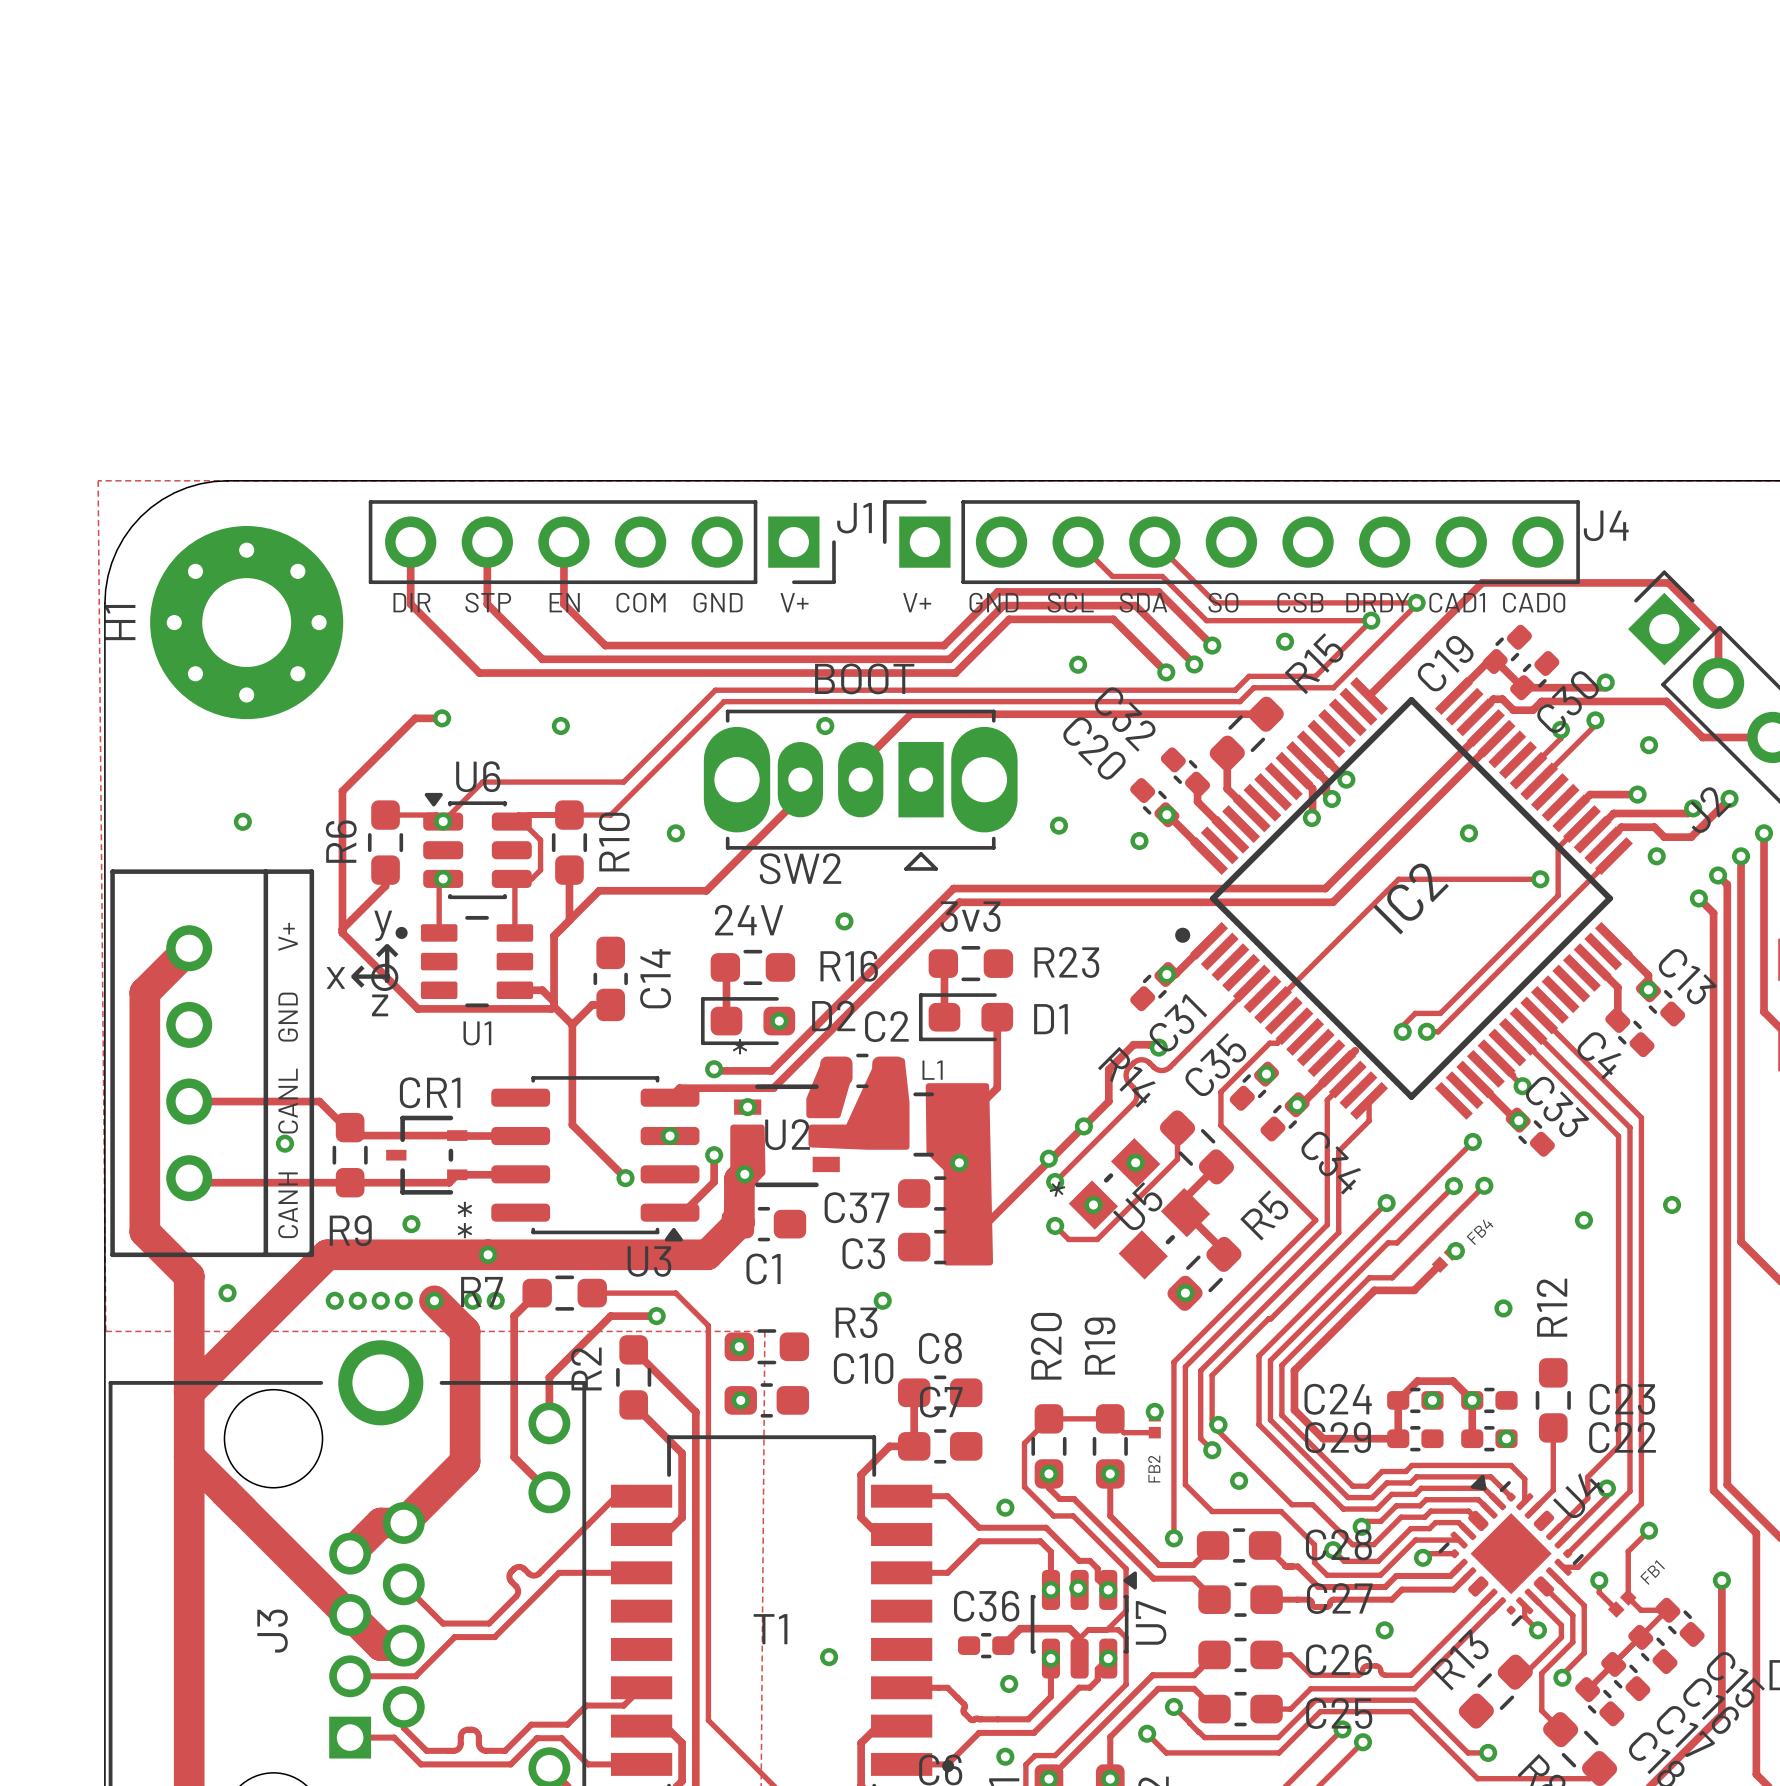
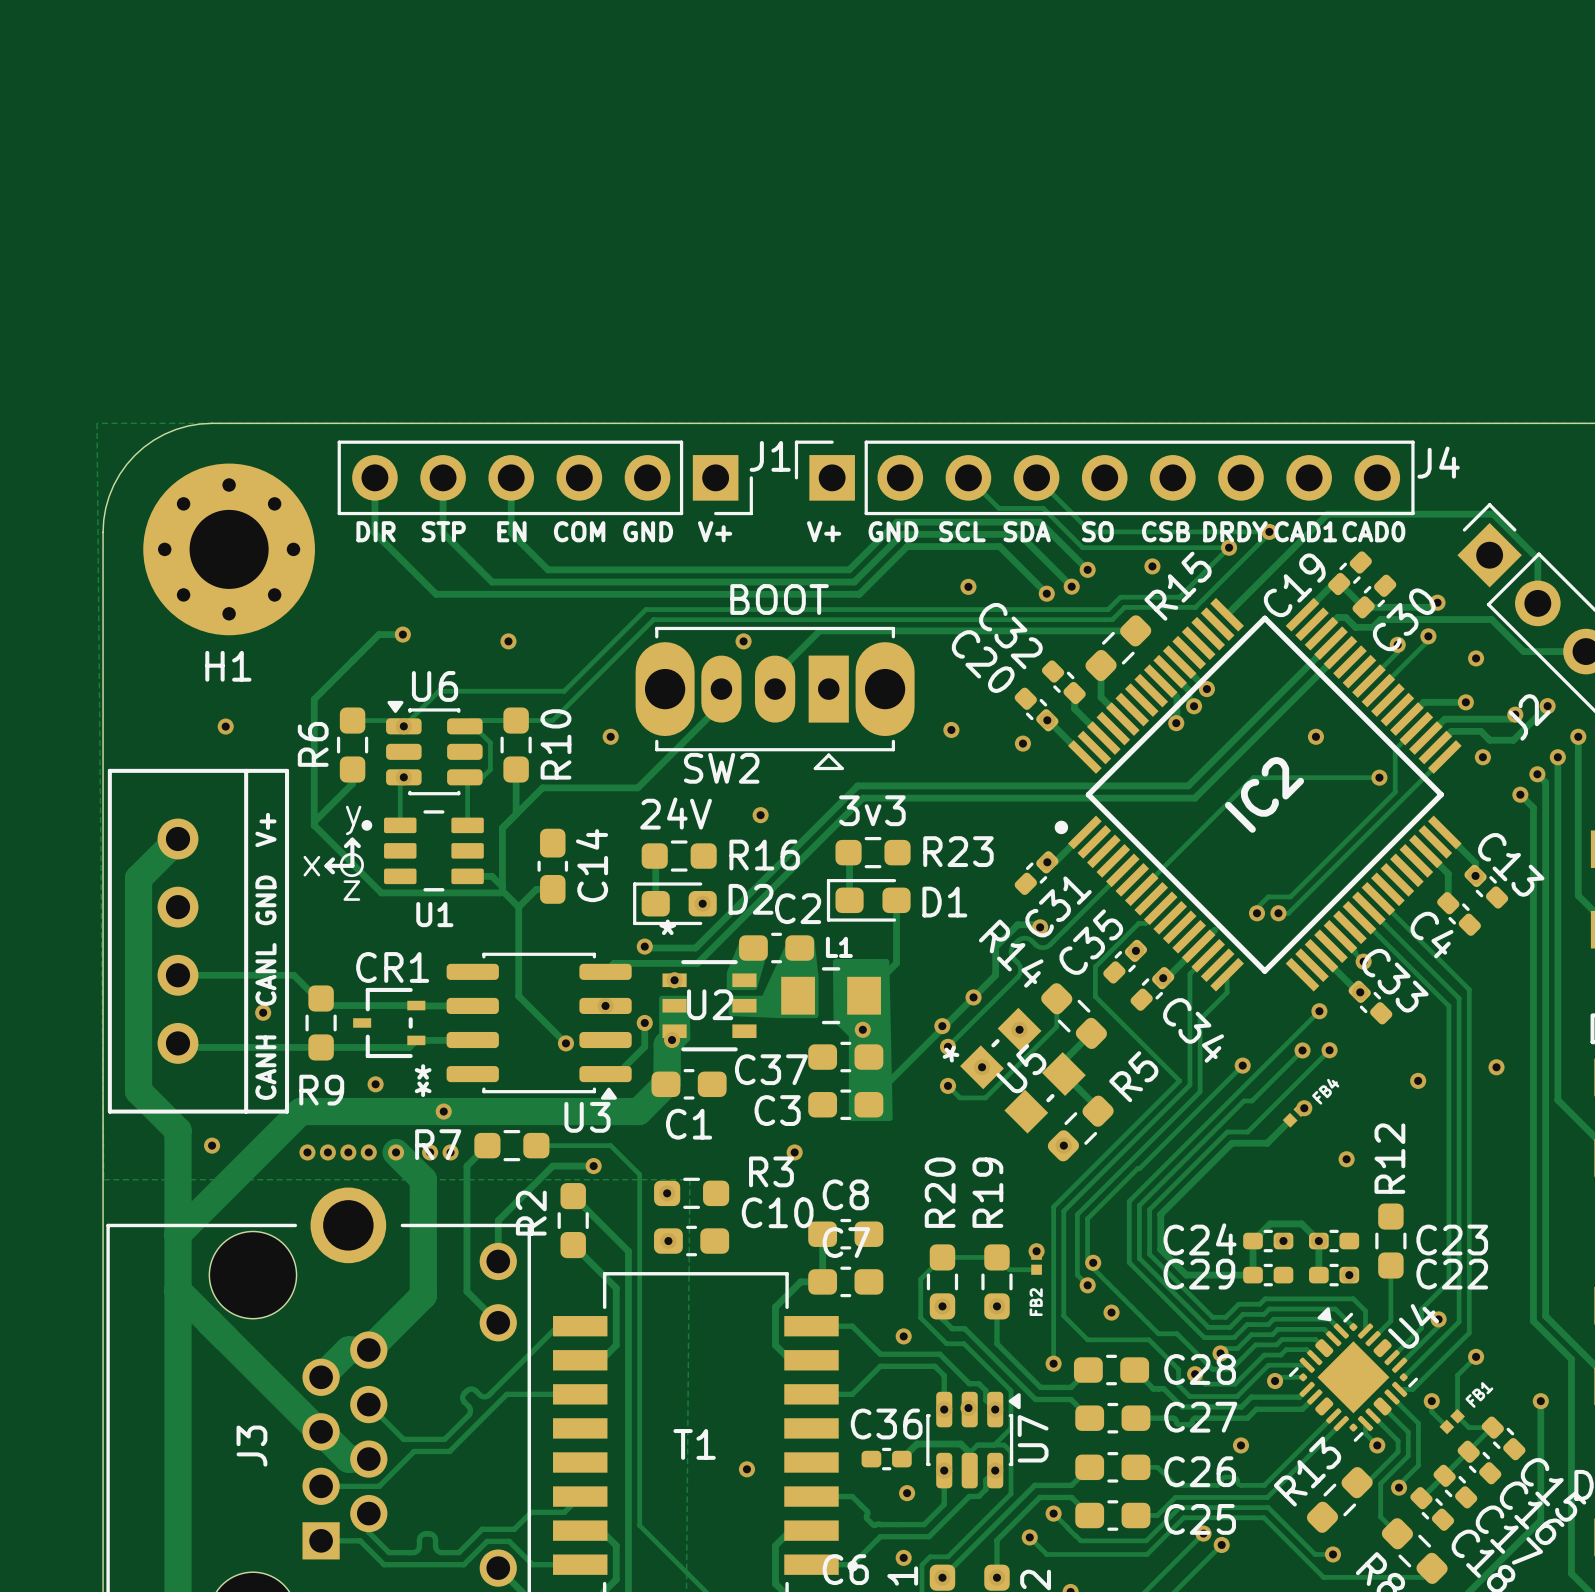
H1 name rotation: 0° (120, 622) -> 90° clockwise (228, 666)
H1 name position: H1 (120, 622) -> H1 (228, 666)

